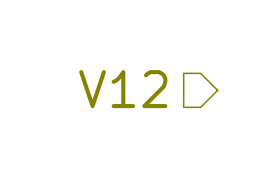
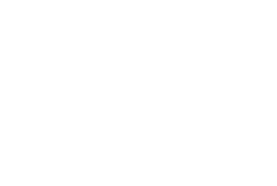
hierarchical label: V12 (123, 89) -> none

